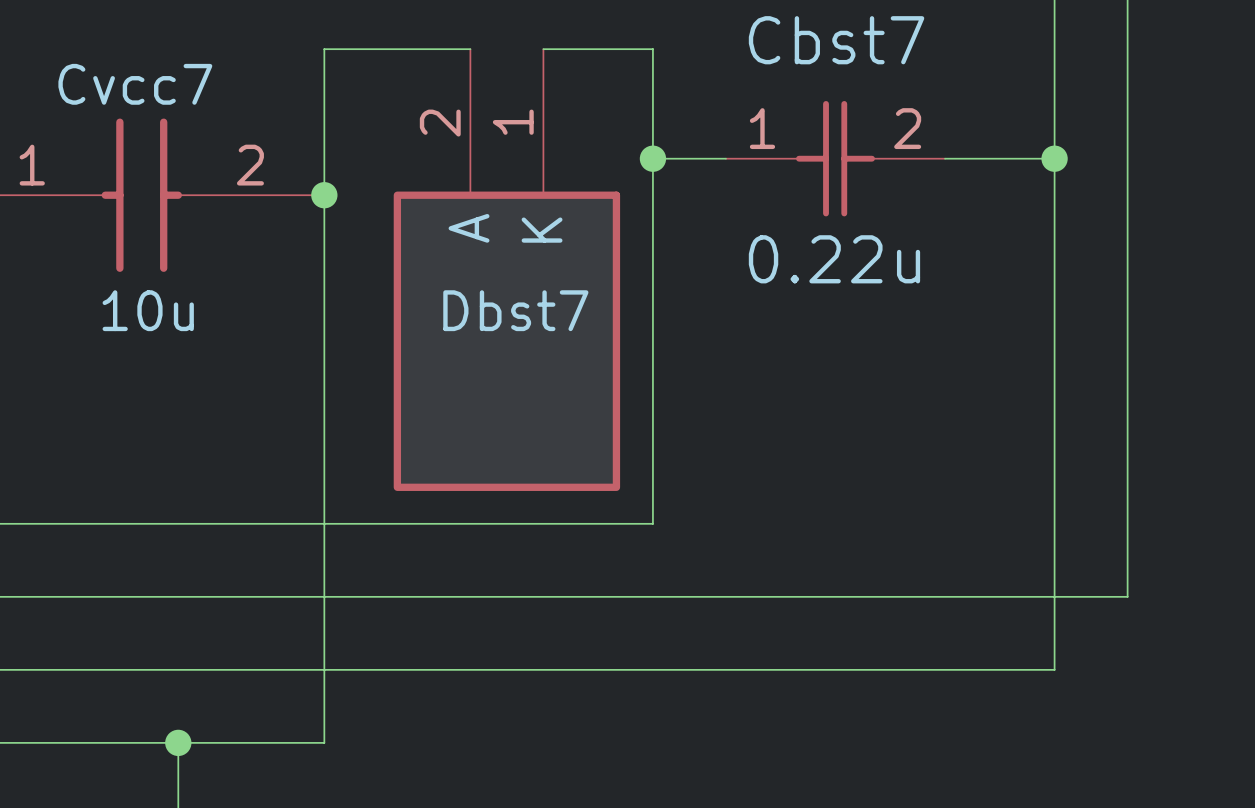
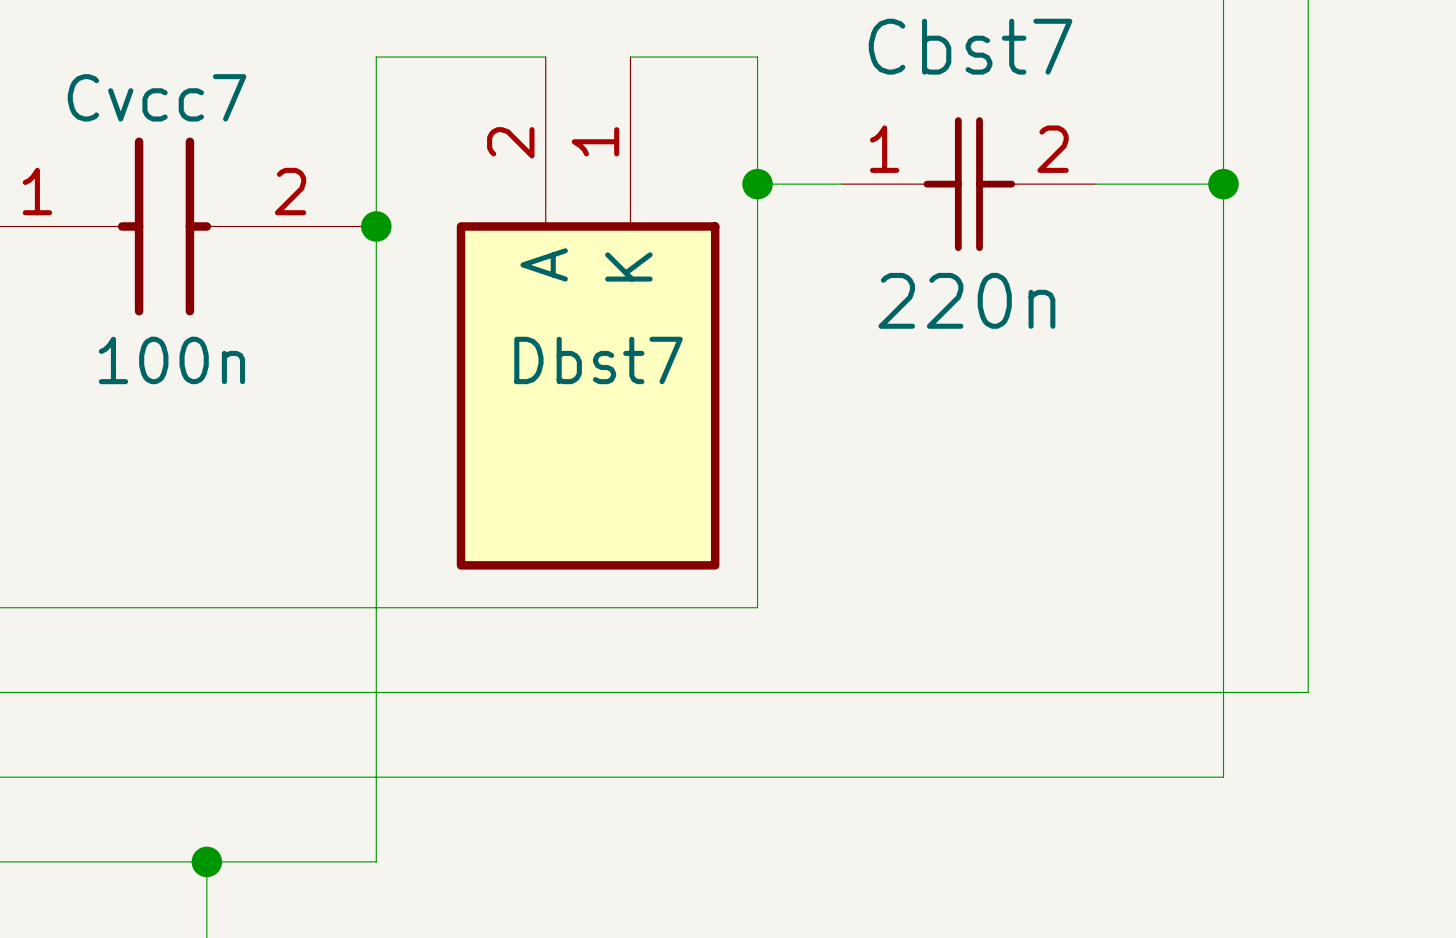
Cbst7 value: 0.22u (834, 259) -> 220n (966, 300)
Cvcc7 value: 10u (148, 310) -> 100n (171, 360)

